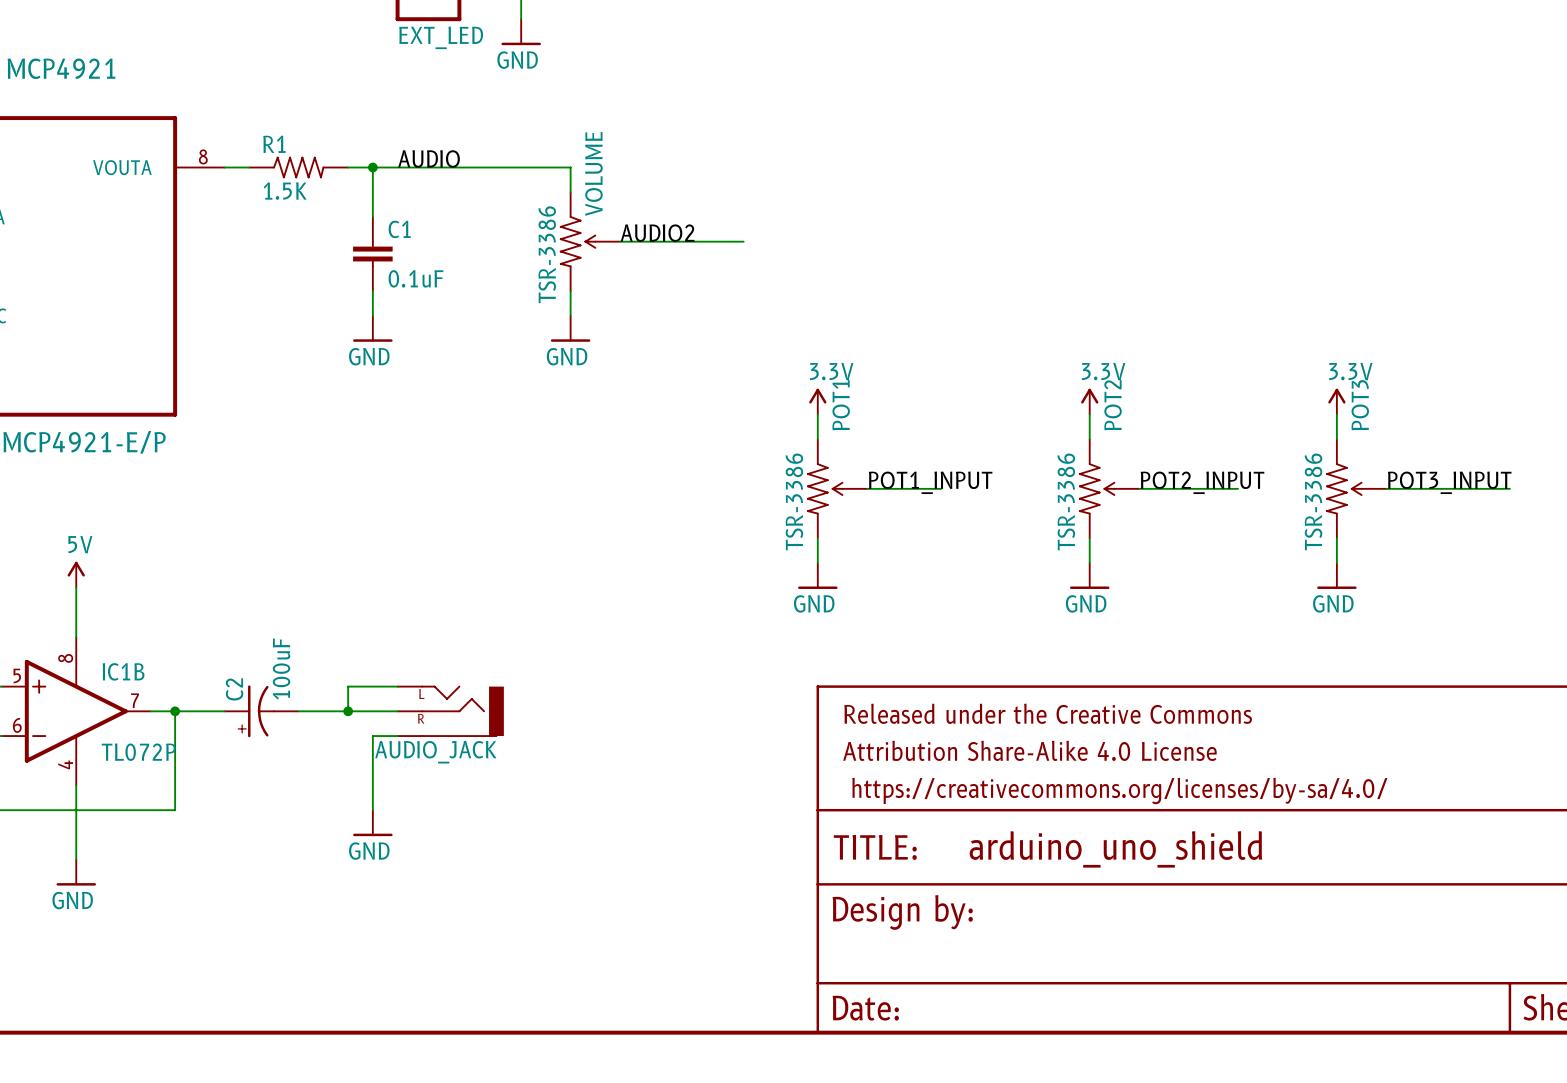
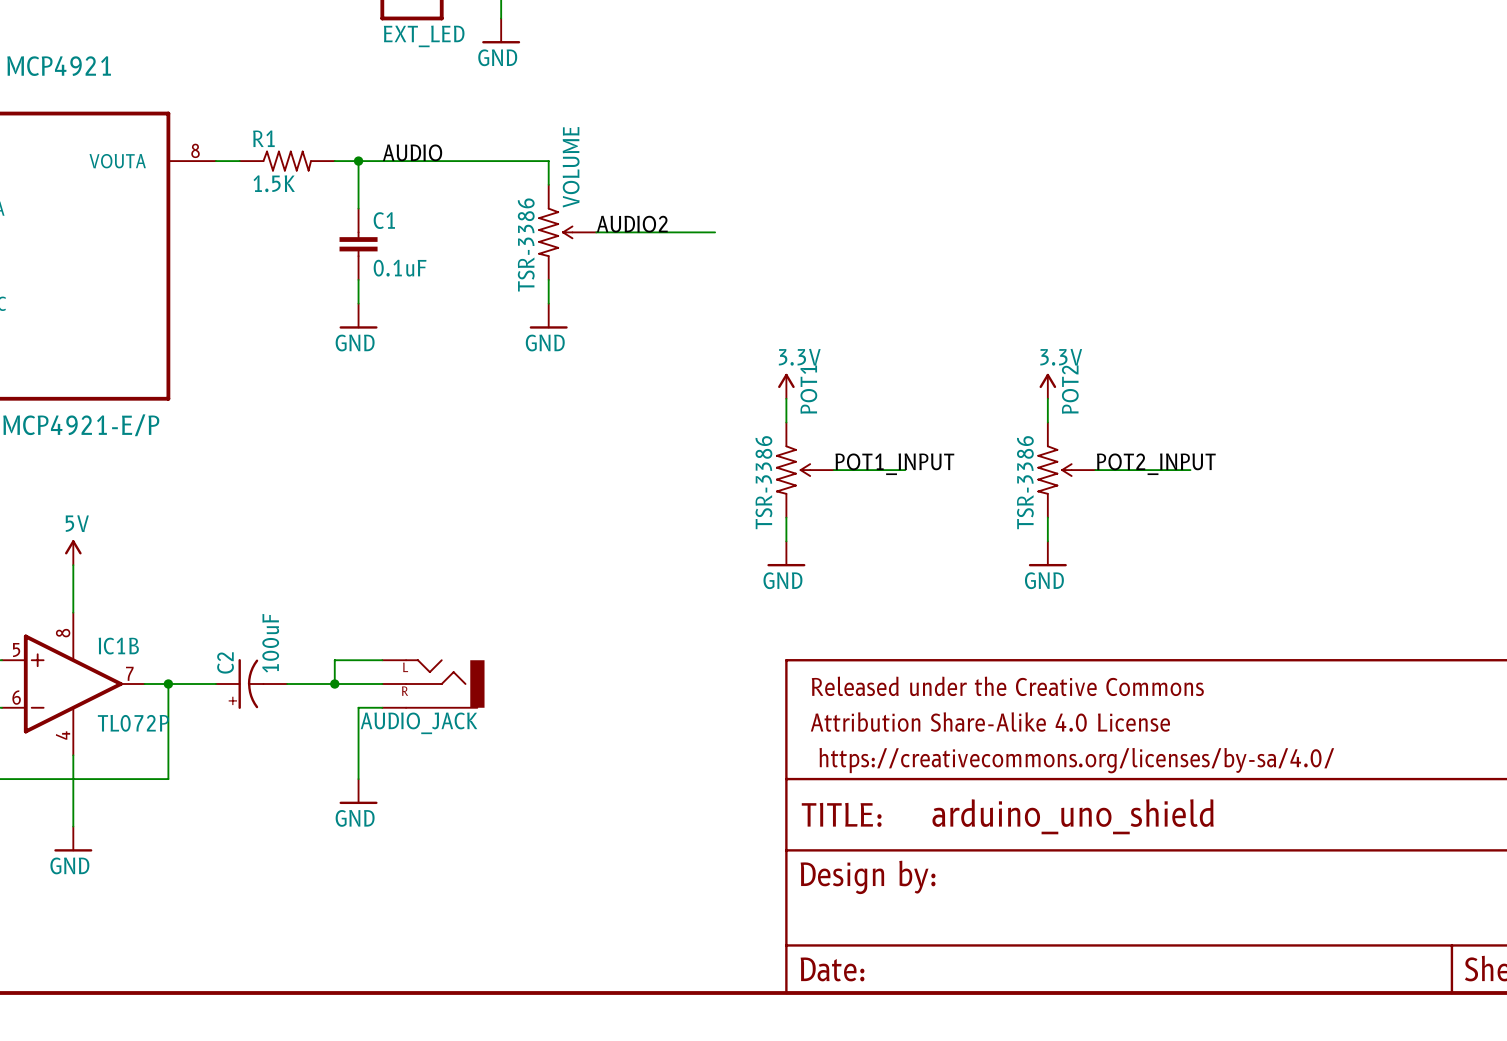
power symbol: 3.3V (1336, 401) -> none
wire: (1336, 414) (1336, 439) -> none
label: POT3_INPUT (1449, 482) -> none
POT3: TSR-3386 (1356, 488) -> none
wire: (1386, 488) (1509, 488) -> none
wire: (1336, 538) (1336, 563) -> none
power symbol: GND (1336, 575) -> none

